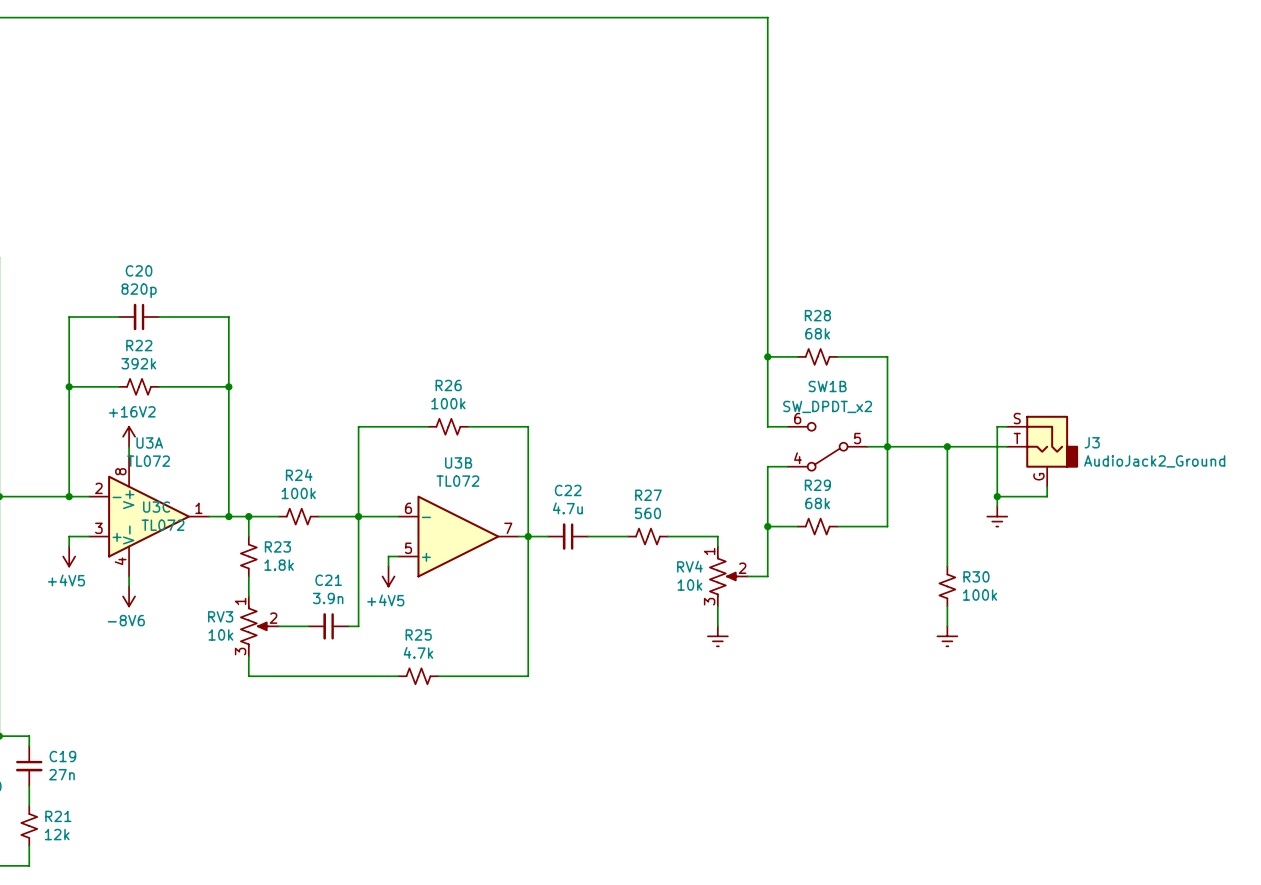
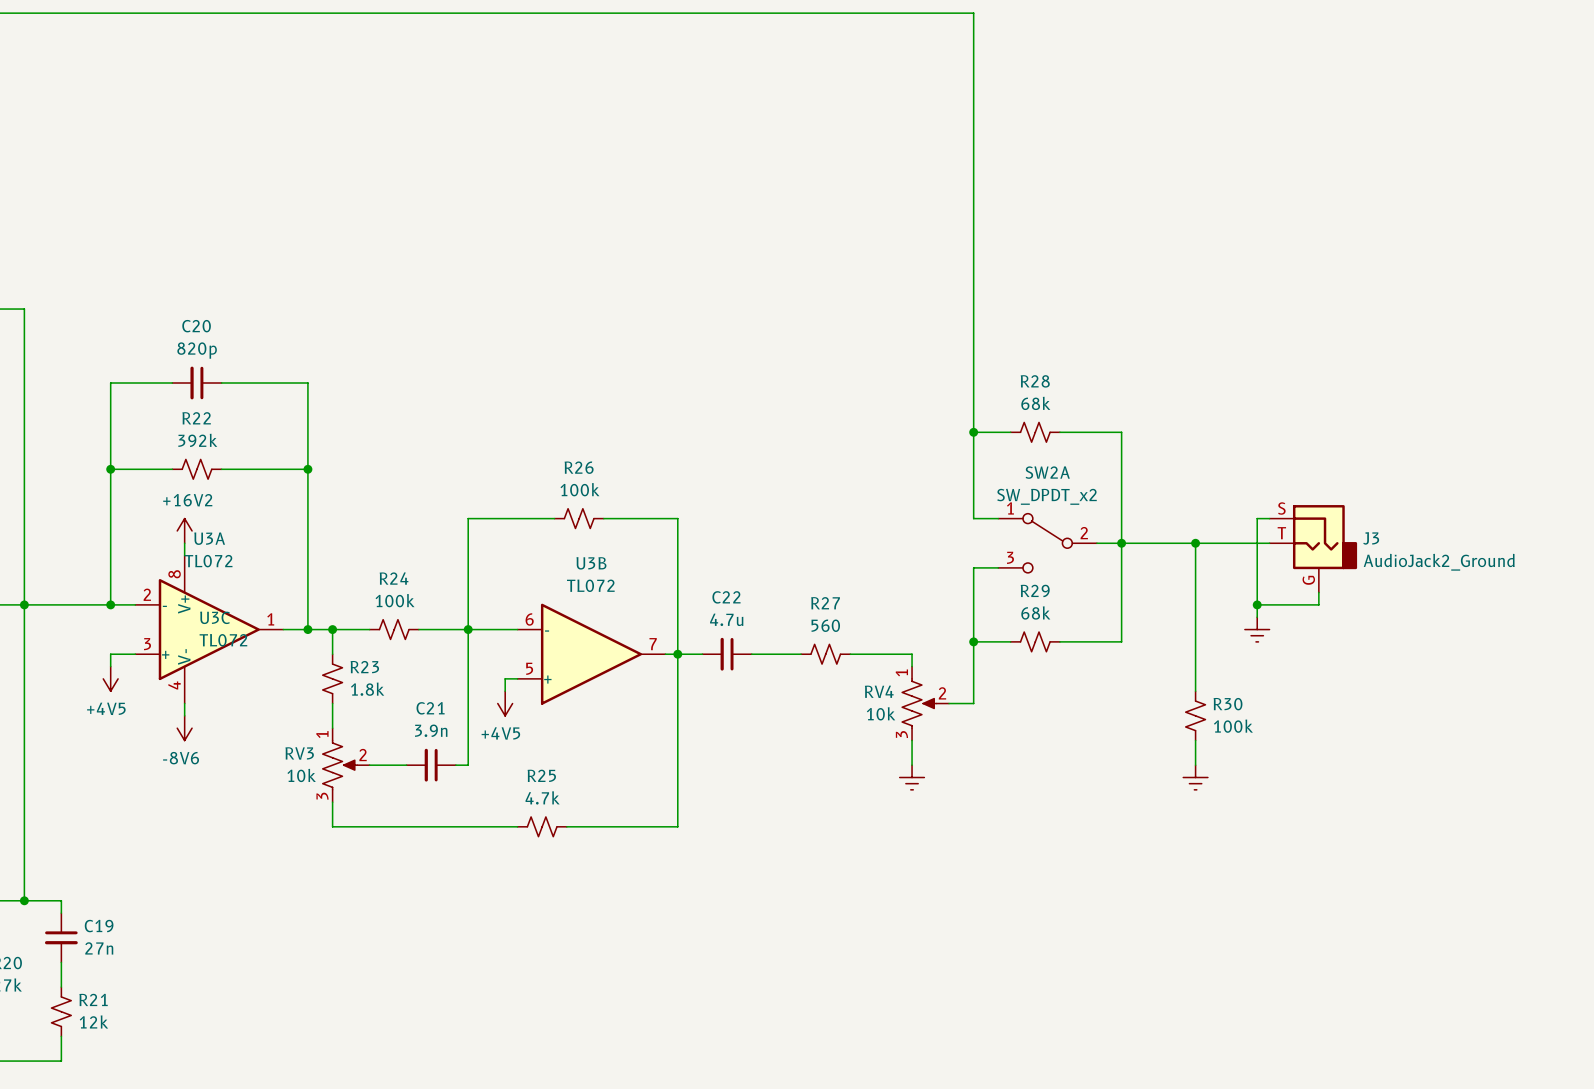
SW1B: SW_DPDT_x2 (827, 446) -> none
SW2A: none -> SW_DPDT_x2 (1047, 543)

